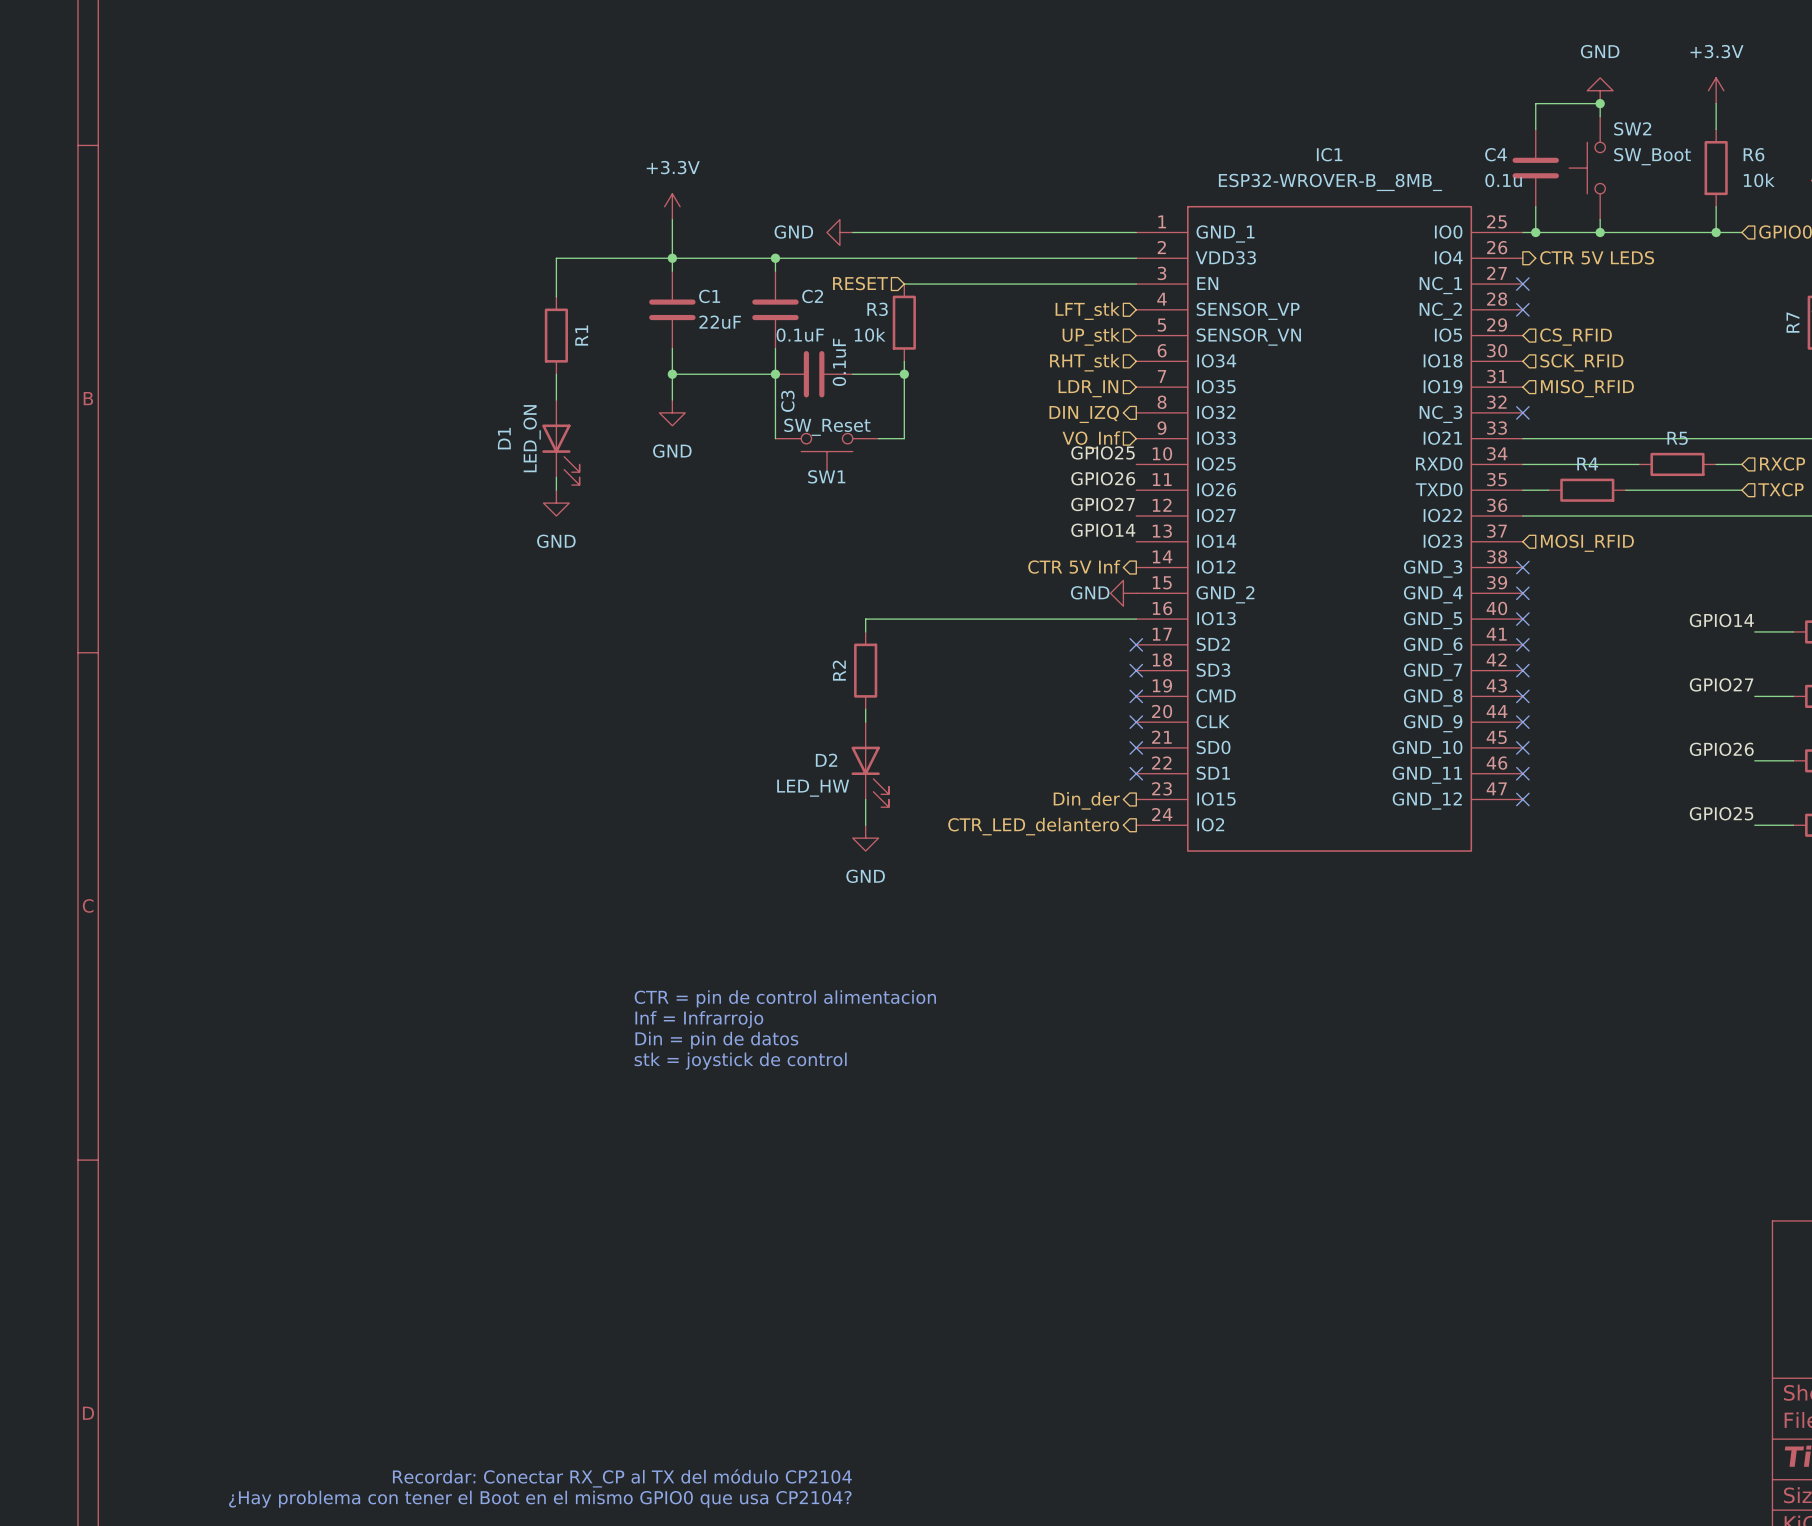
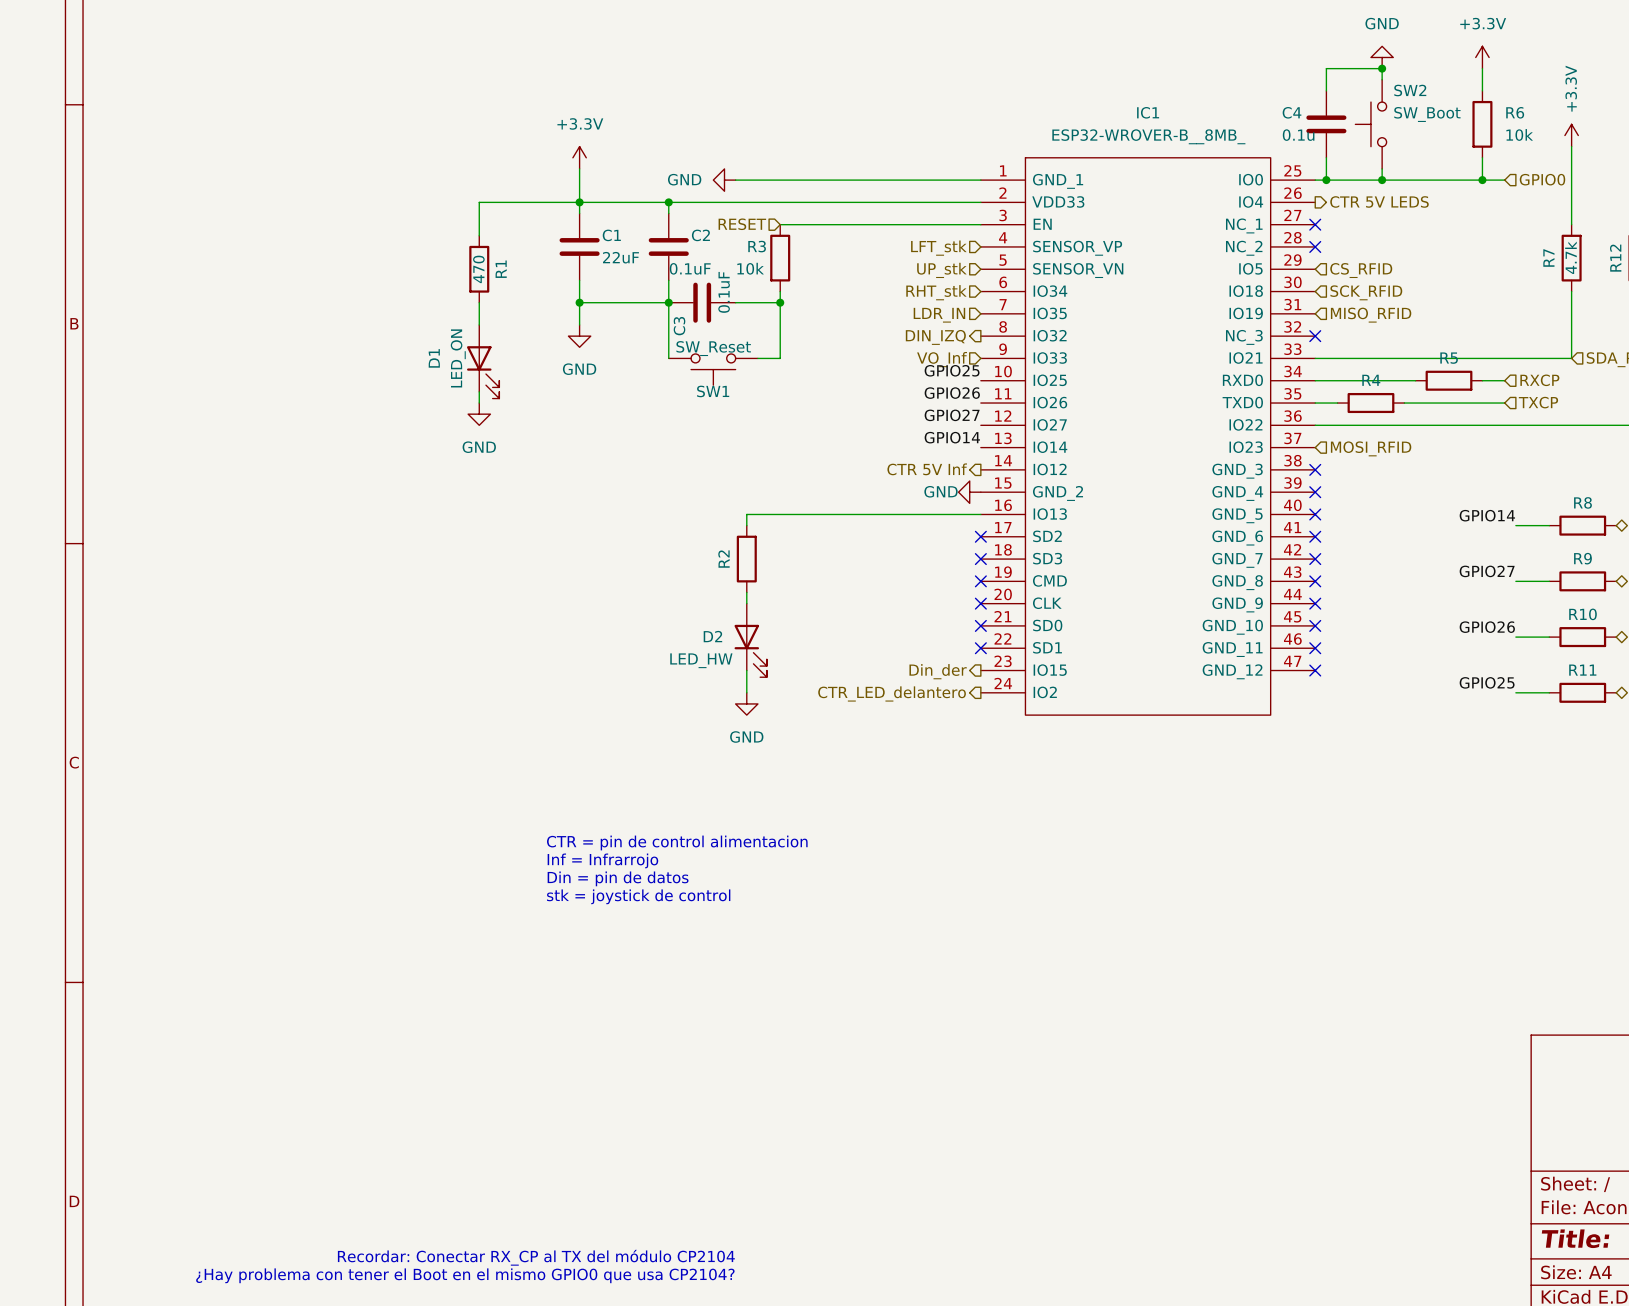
R1 value: none -> 470 (478, 269)

